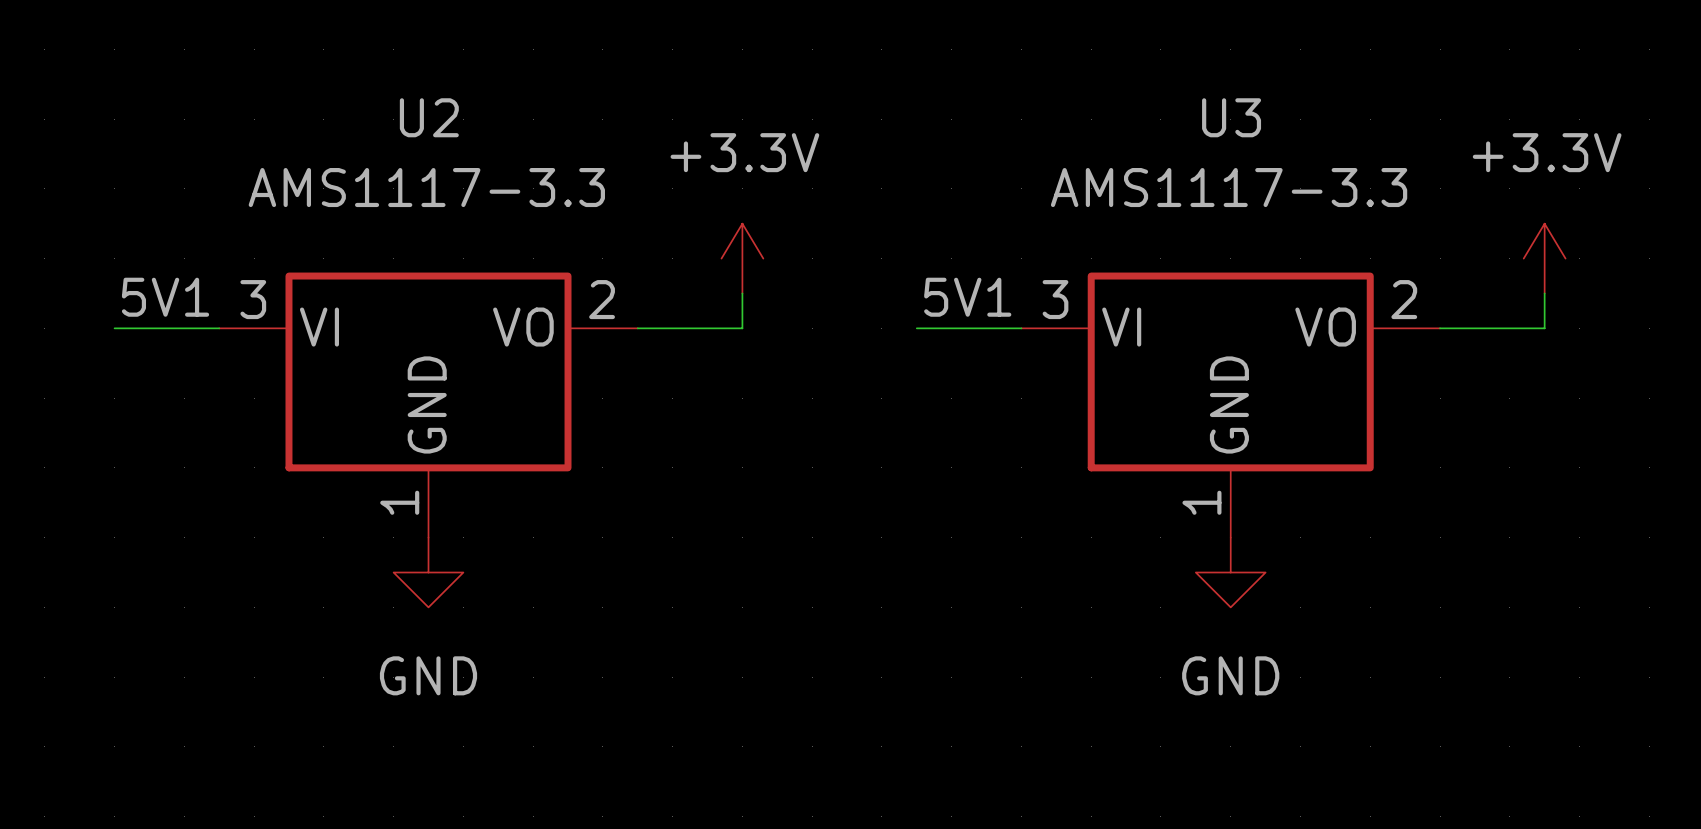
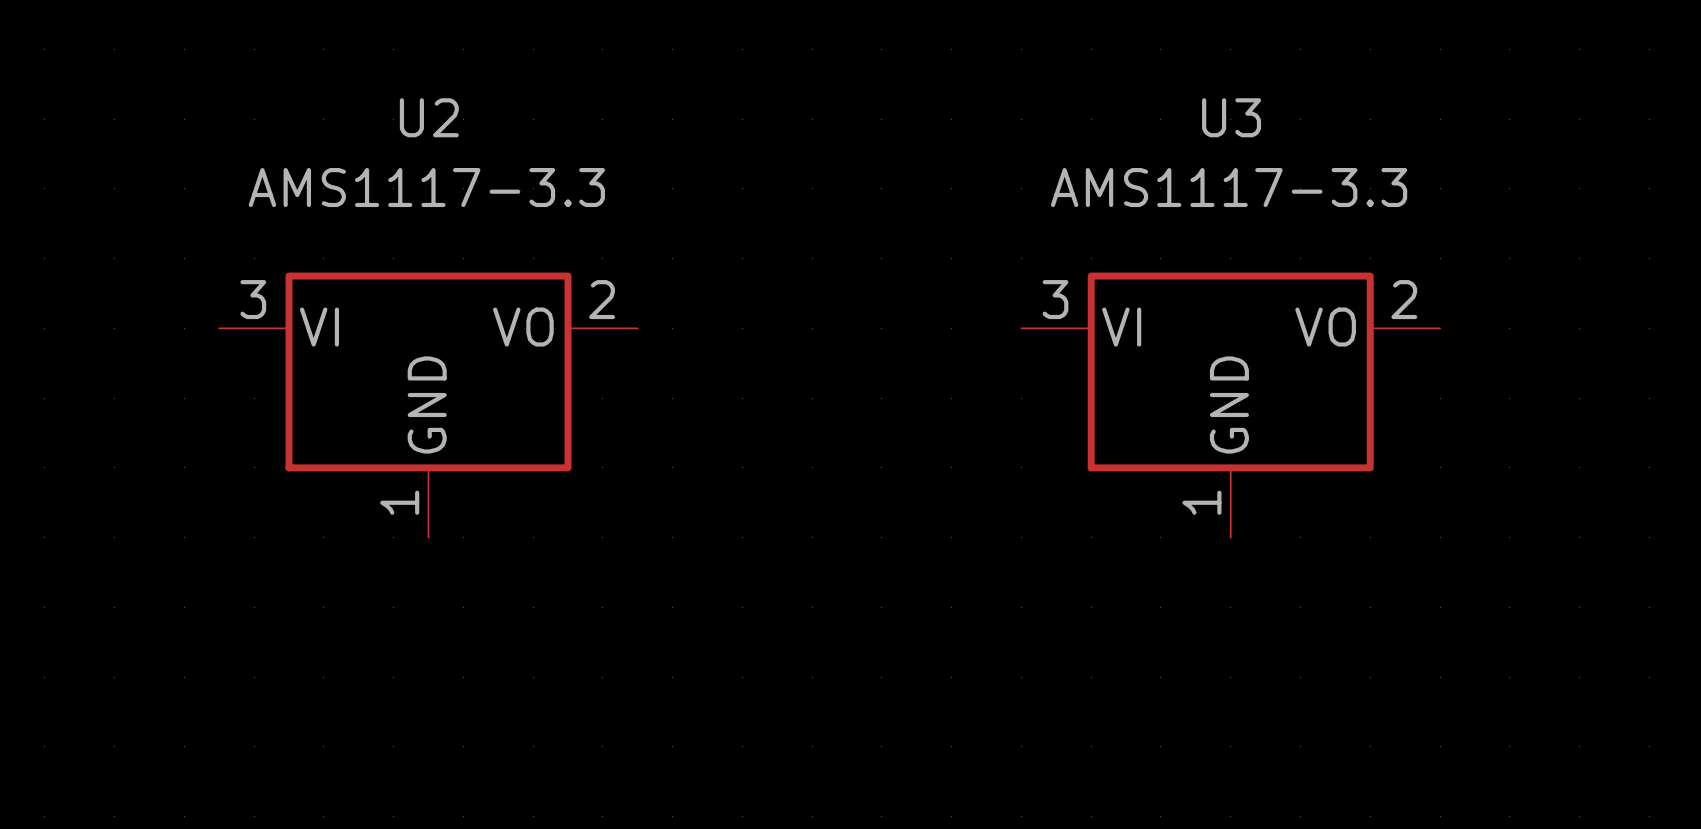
power symbol: +3.3V (742, 258) -> none
power symbol: +3.3V (1544, 258) -> none
wire: (742, 293) (742, 328) (637, 328) -> none
wire: (1544, 293) (1544, 328) (1440, 328) -> none
label: 5V1 (165, 297) -> none
label: 5V1 (967, 297) -> none
wire: (114, 328) (219, 328) -> none
wire: (916, 328) (1021, 328) -> none
power symbol: GND (428, 572) -> none
power symbol: GND (1230, 572) -> none

